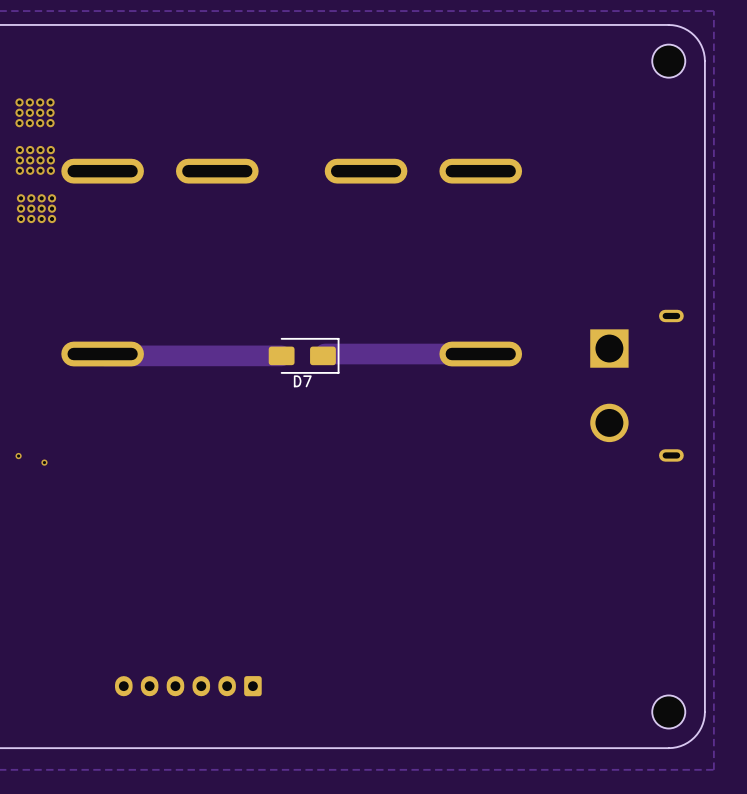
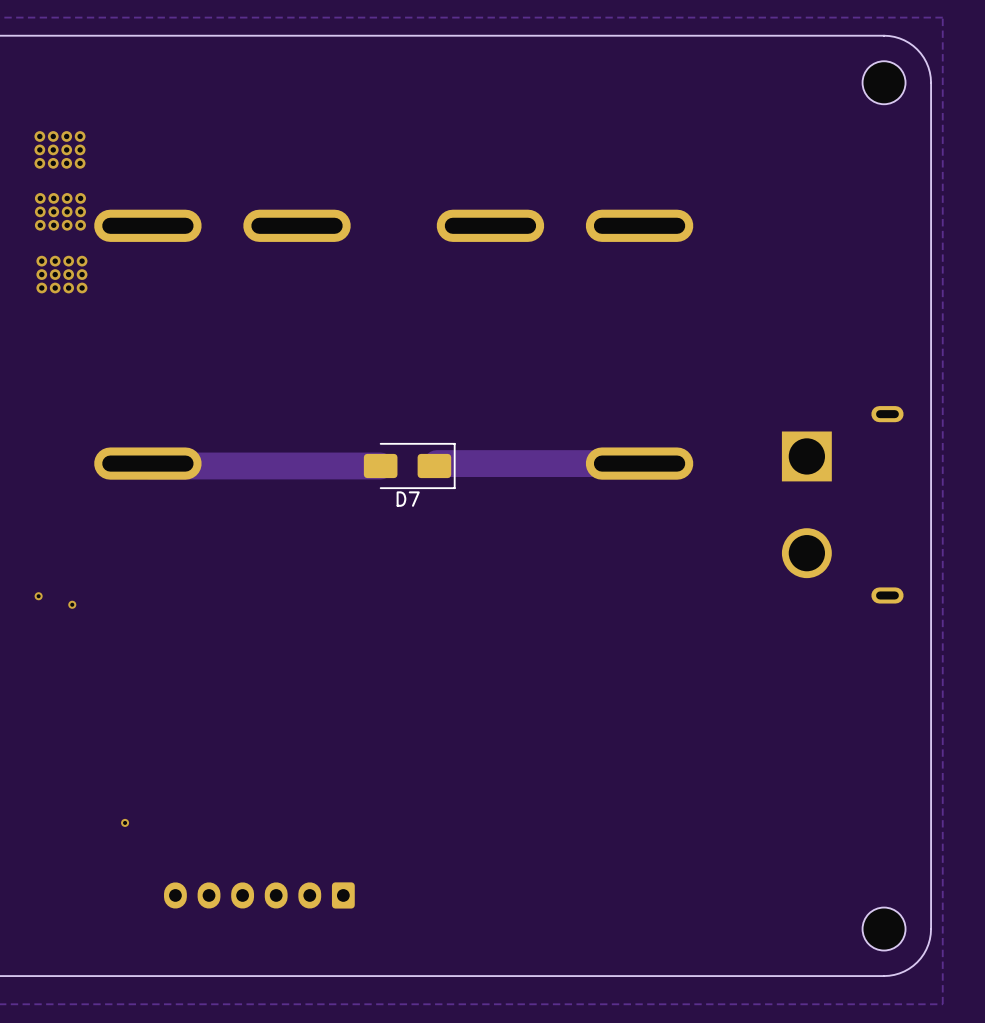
via: none -> (125, 822)

